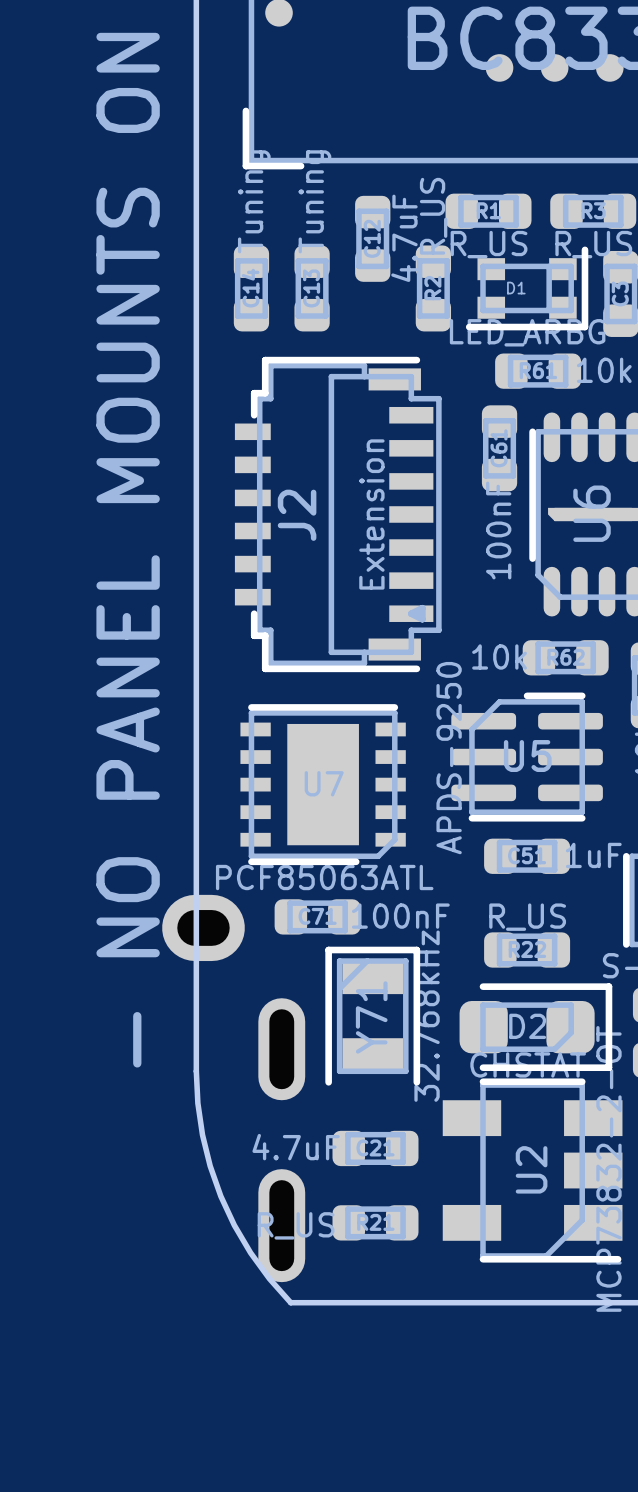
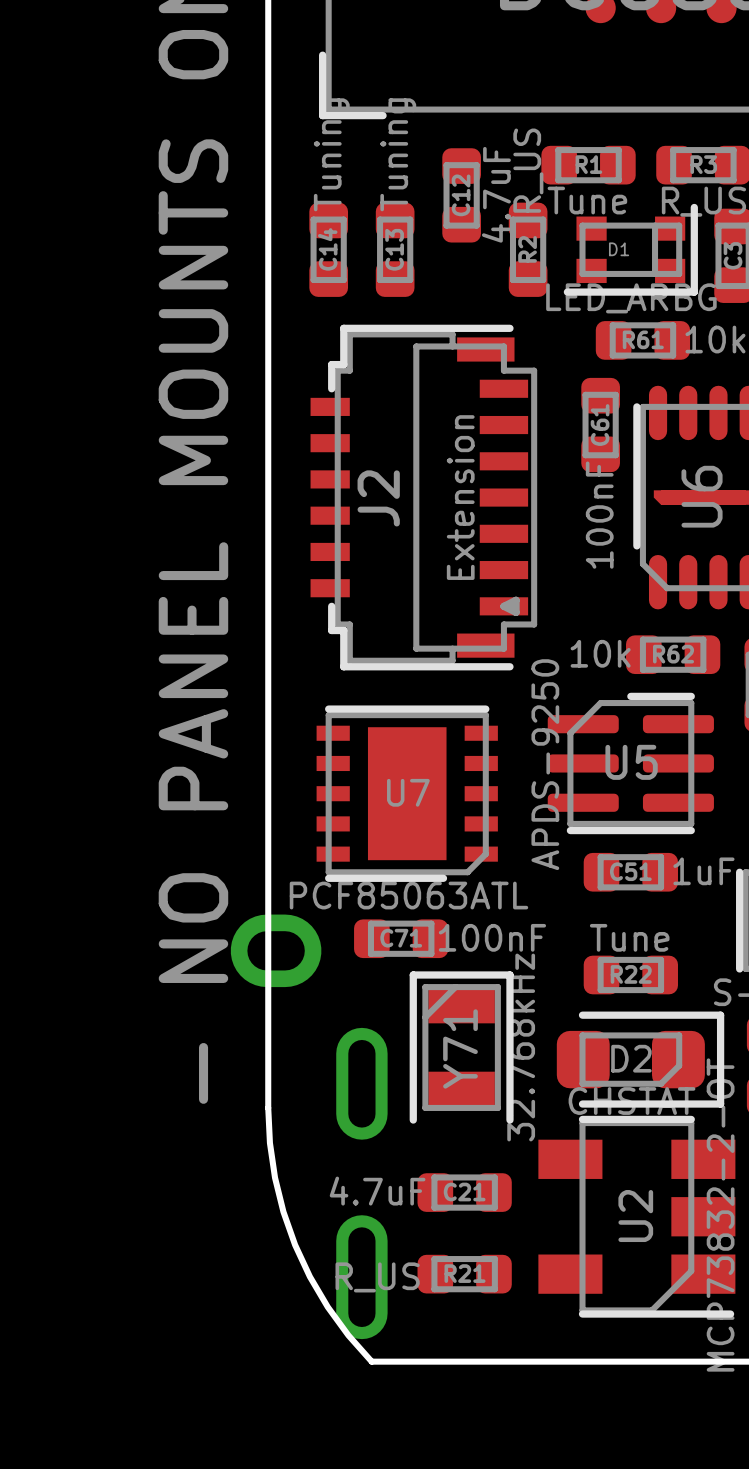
R1 value: R_US (489, 244) -> Tune (587, 200)
R22 value: R_US (527, 917) -> Tune (629, 937)

